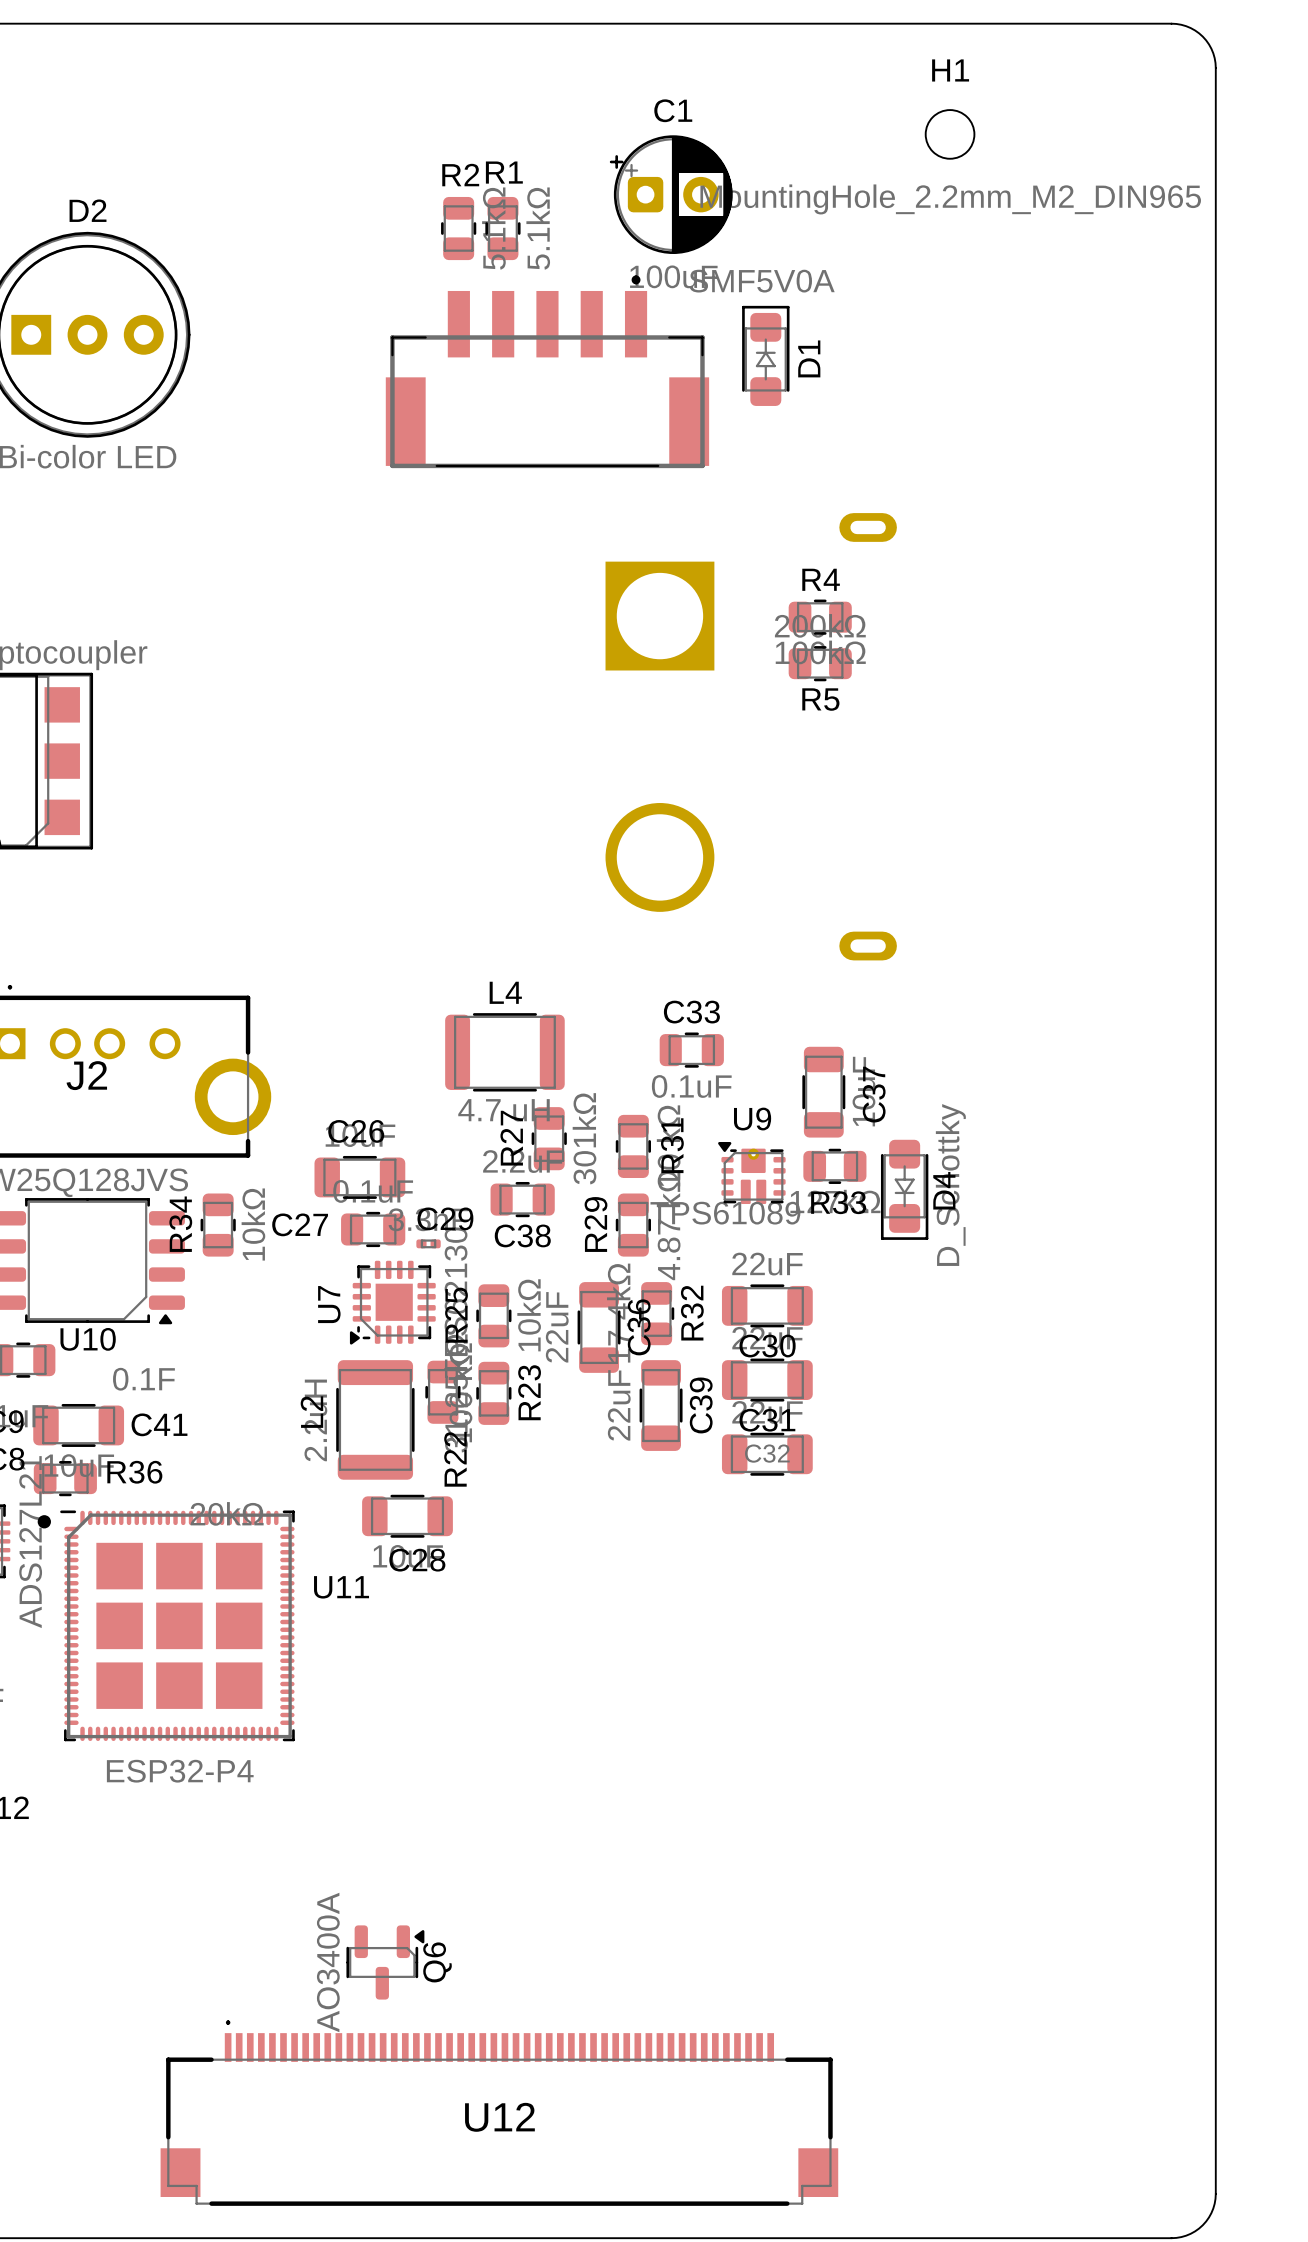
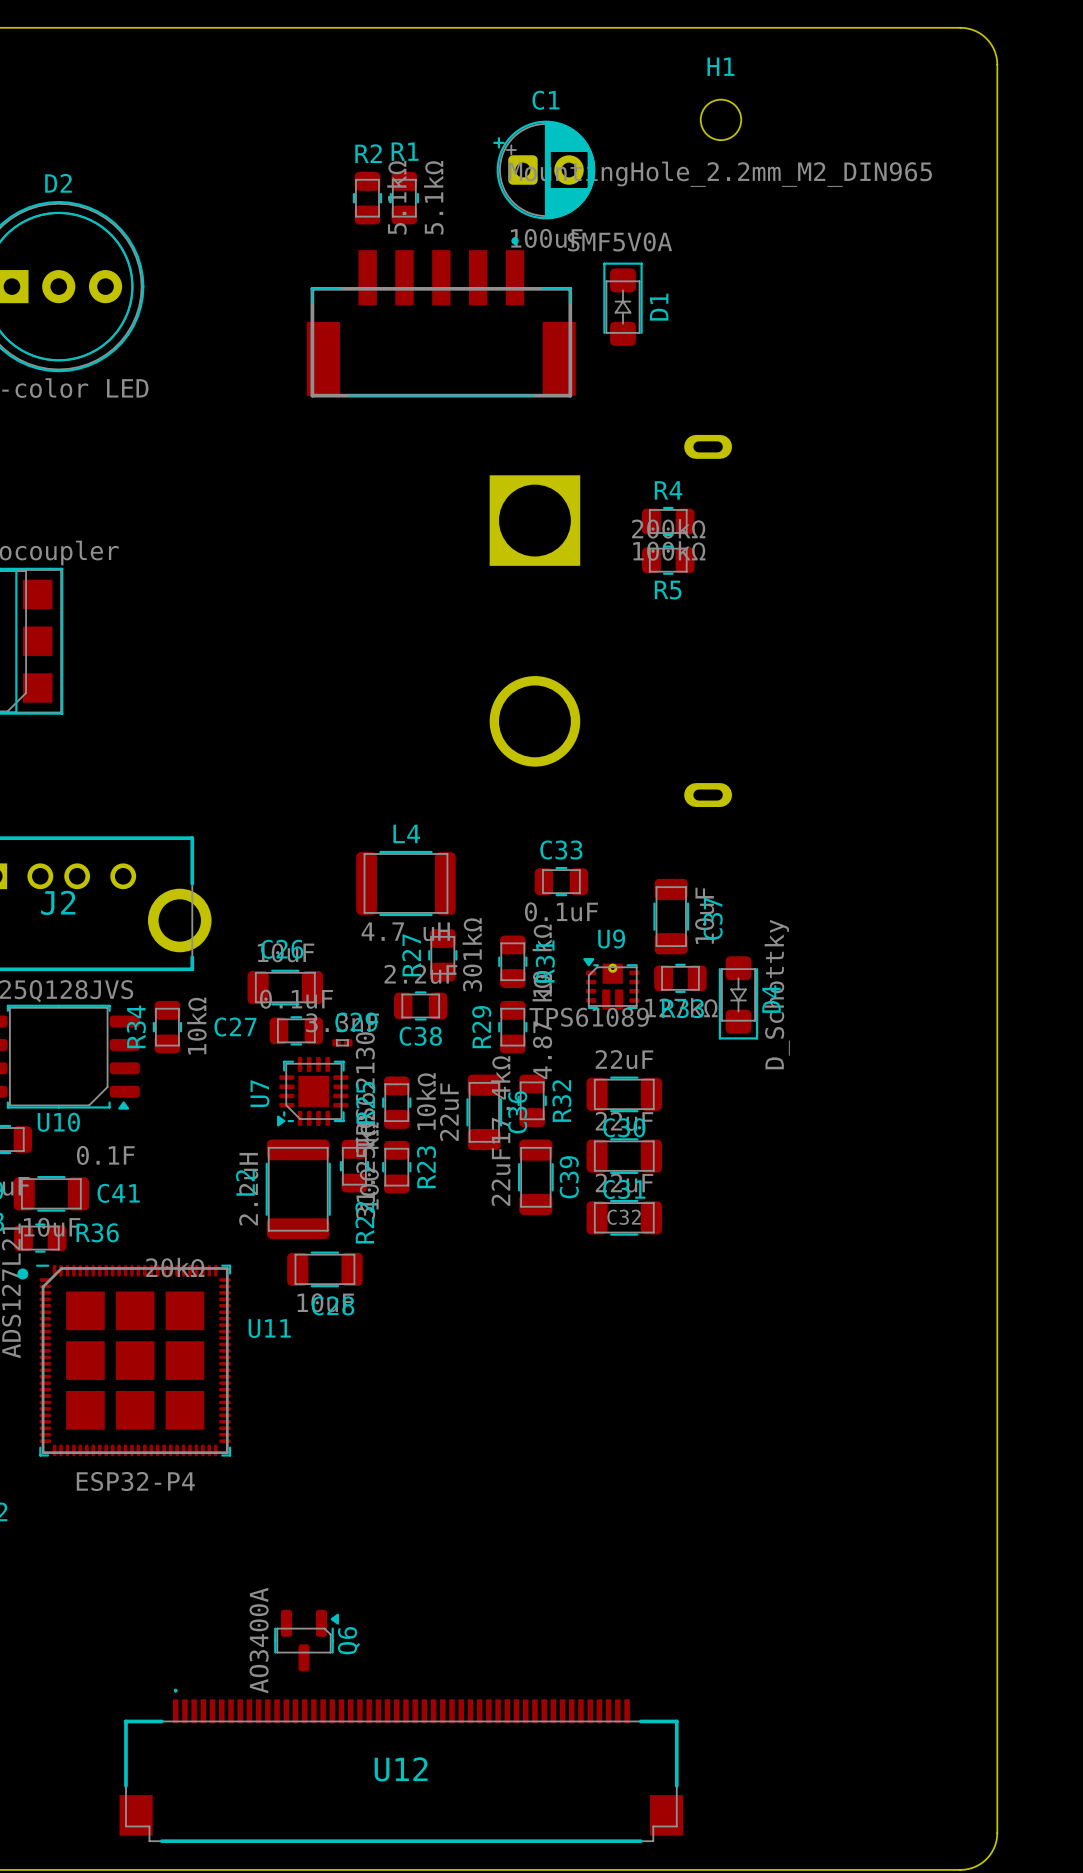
H1 position: (950, 134) -> (720, 119)

